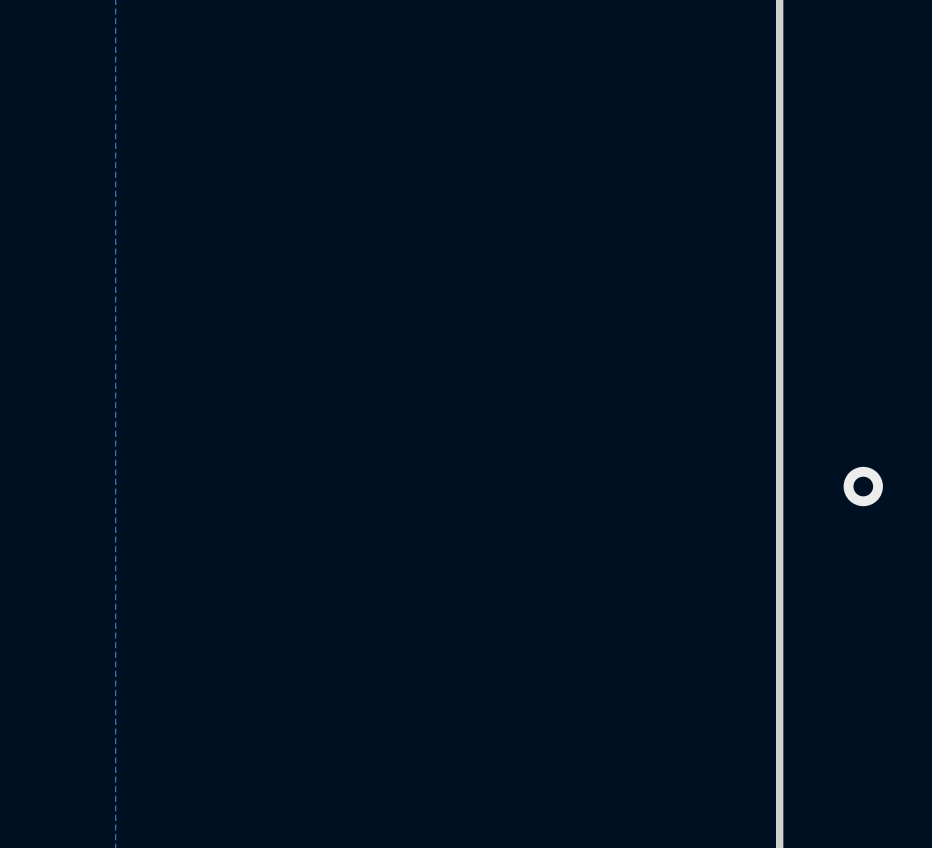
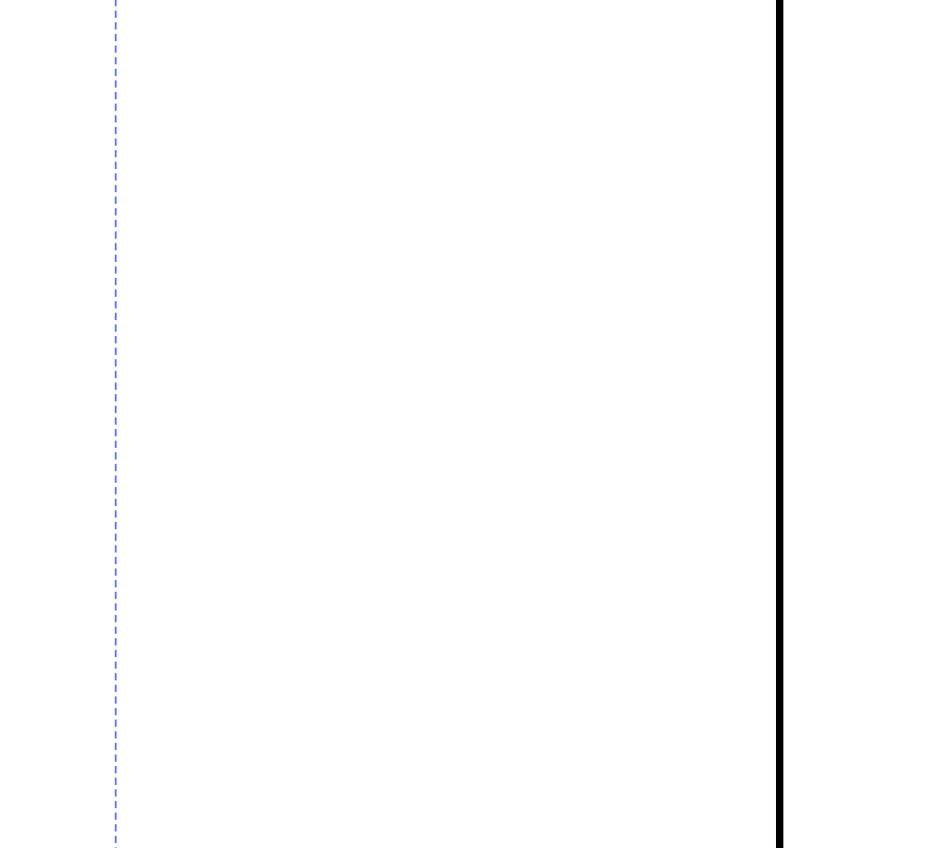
via: (863, 486) -> none

